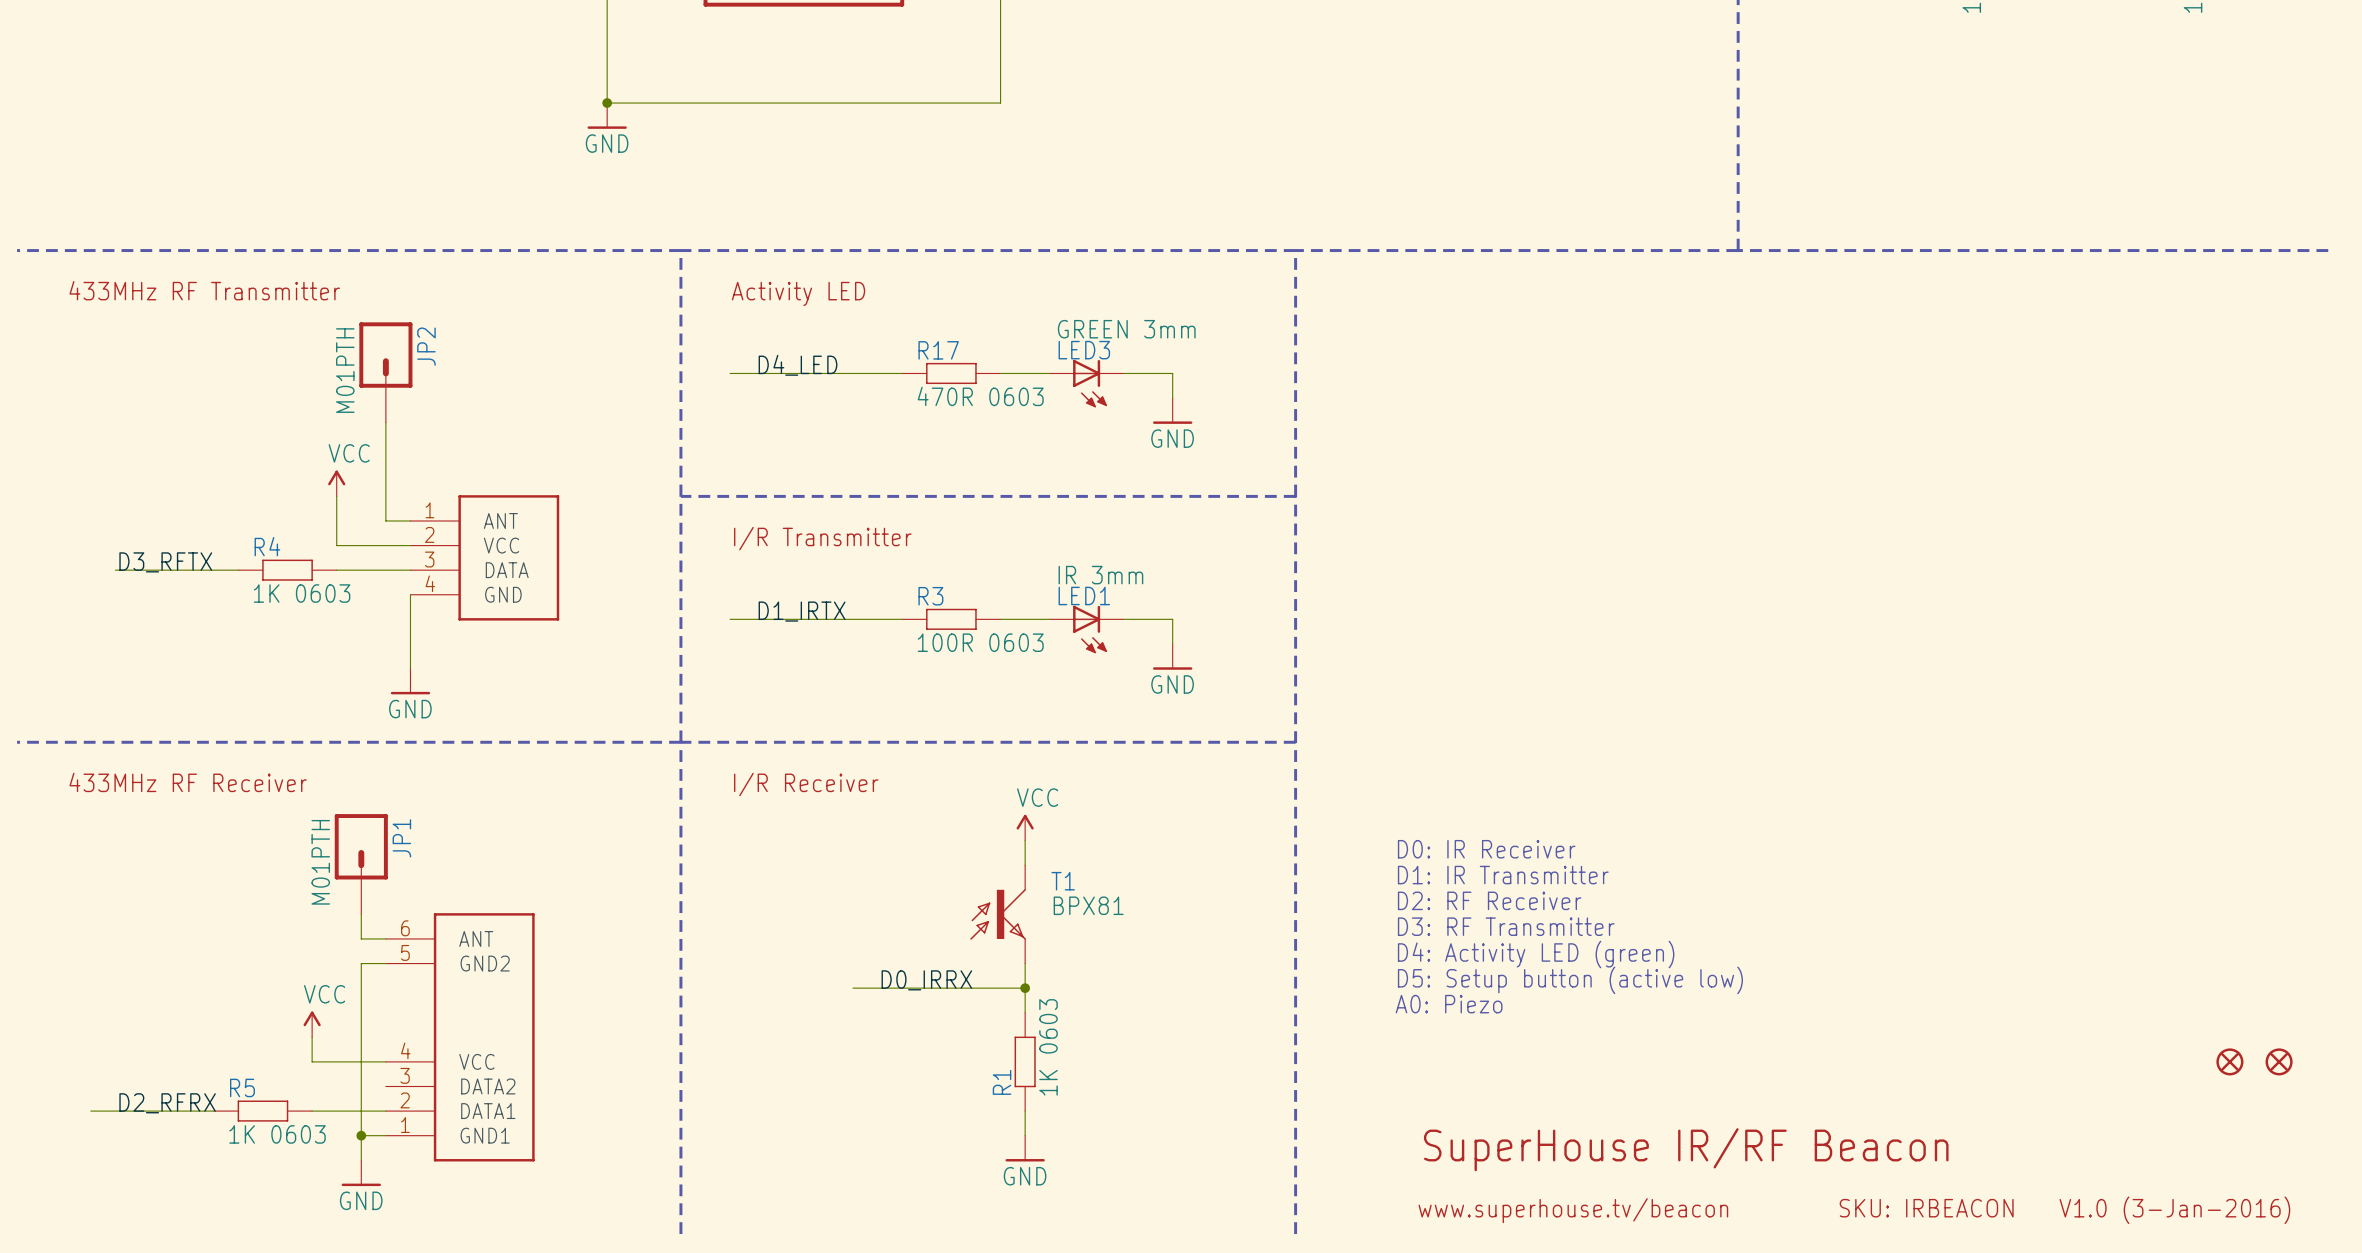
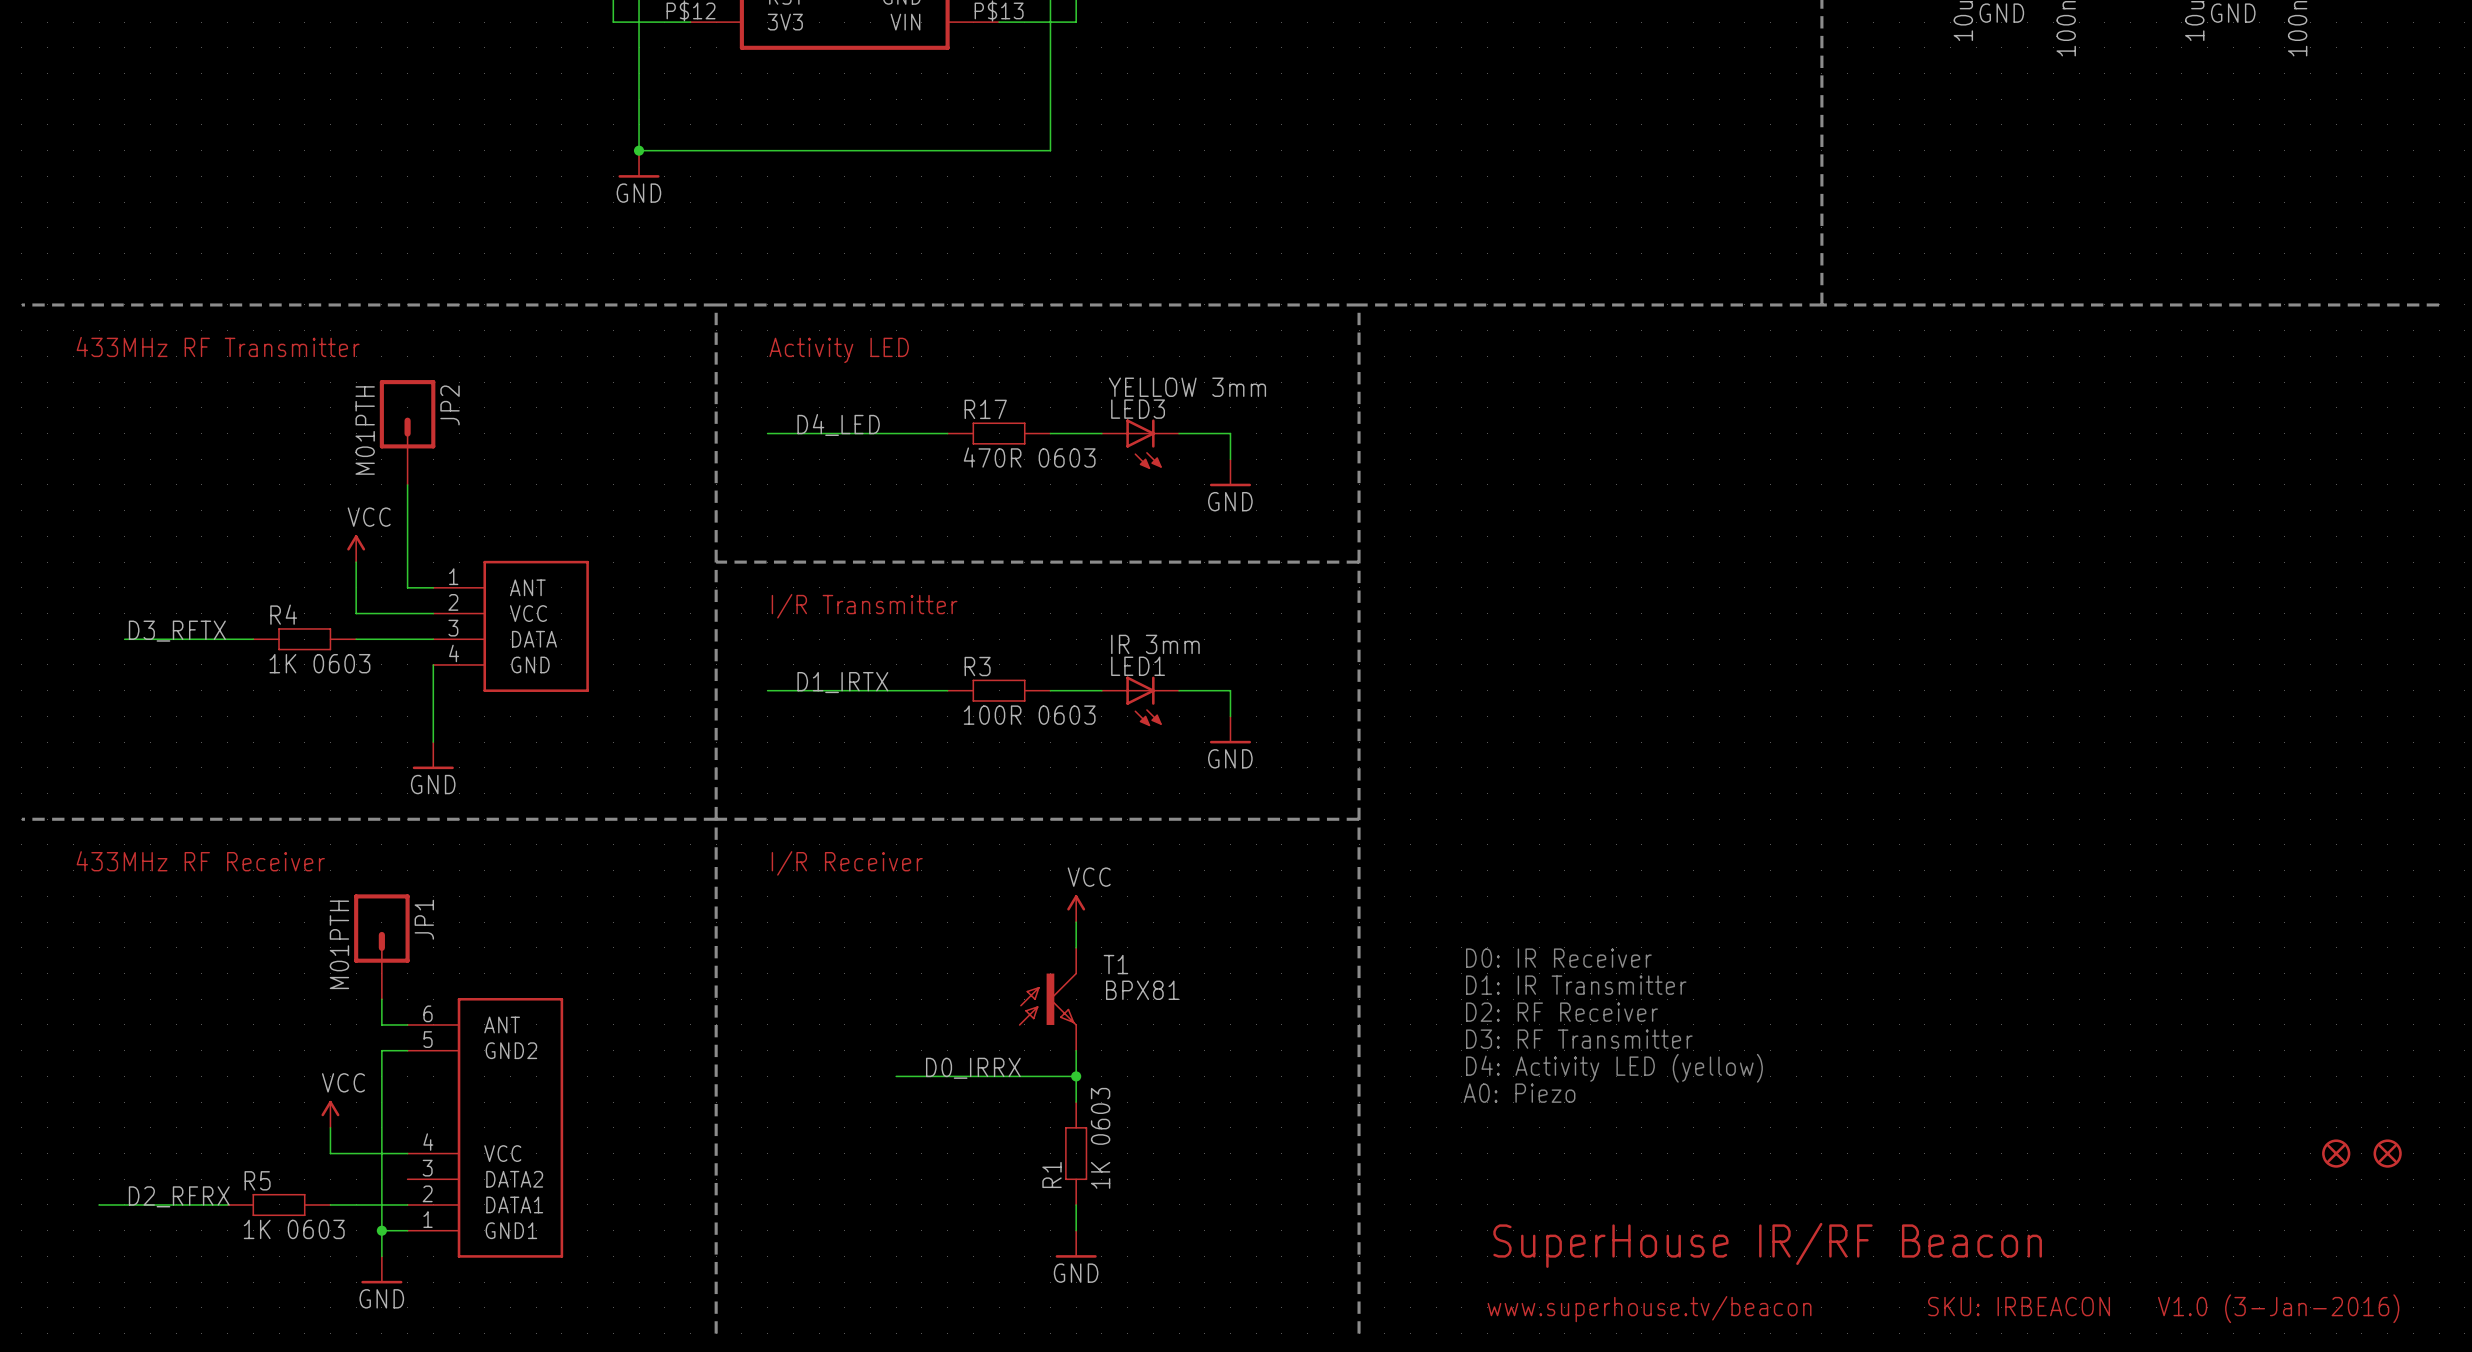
LED3 value: GREEN 3mm (1126, 329) -> YELLOW 3mm (1187, 387)
text: D0: IR Receiver (1486, 849) -> none
text: D1: IR Transmitter (1503, 875) -> D0: IR Receiver (1558, 958)
text: D2: RF Receiver (1489, 900) -> D1: IR Transmitter (1576, 985)
text: D3: RF Transmitter (1506, 926) -> D2: RF Receiver (1561, 1012)
text: D4: Activity LED (green) (1536, 954) -> D3: RF Transmitter (1579, 1039)
text: D5: Setup button (active low) (1570, 980) -> D4: Activity LED (yellow) (1614, 1068)

